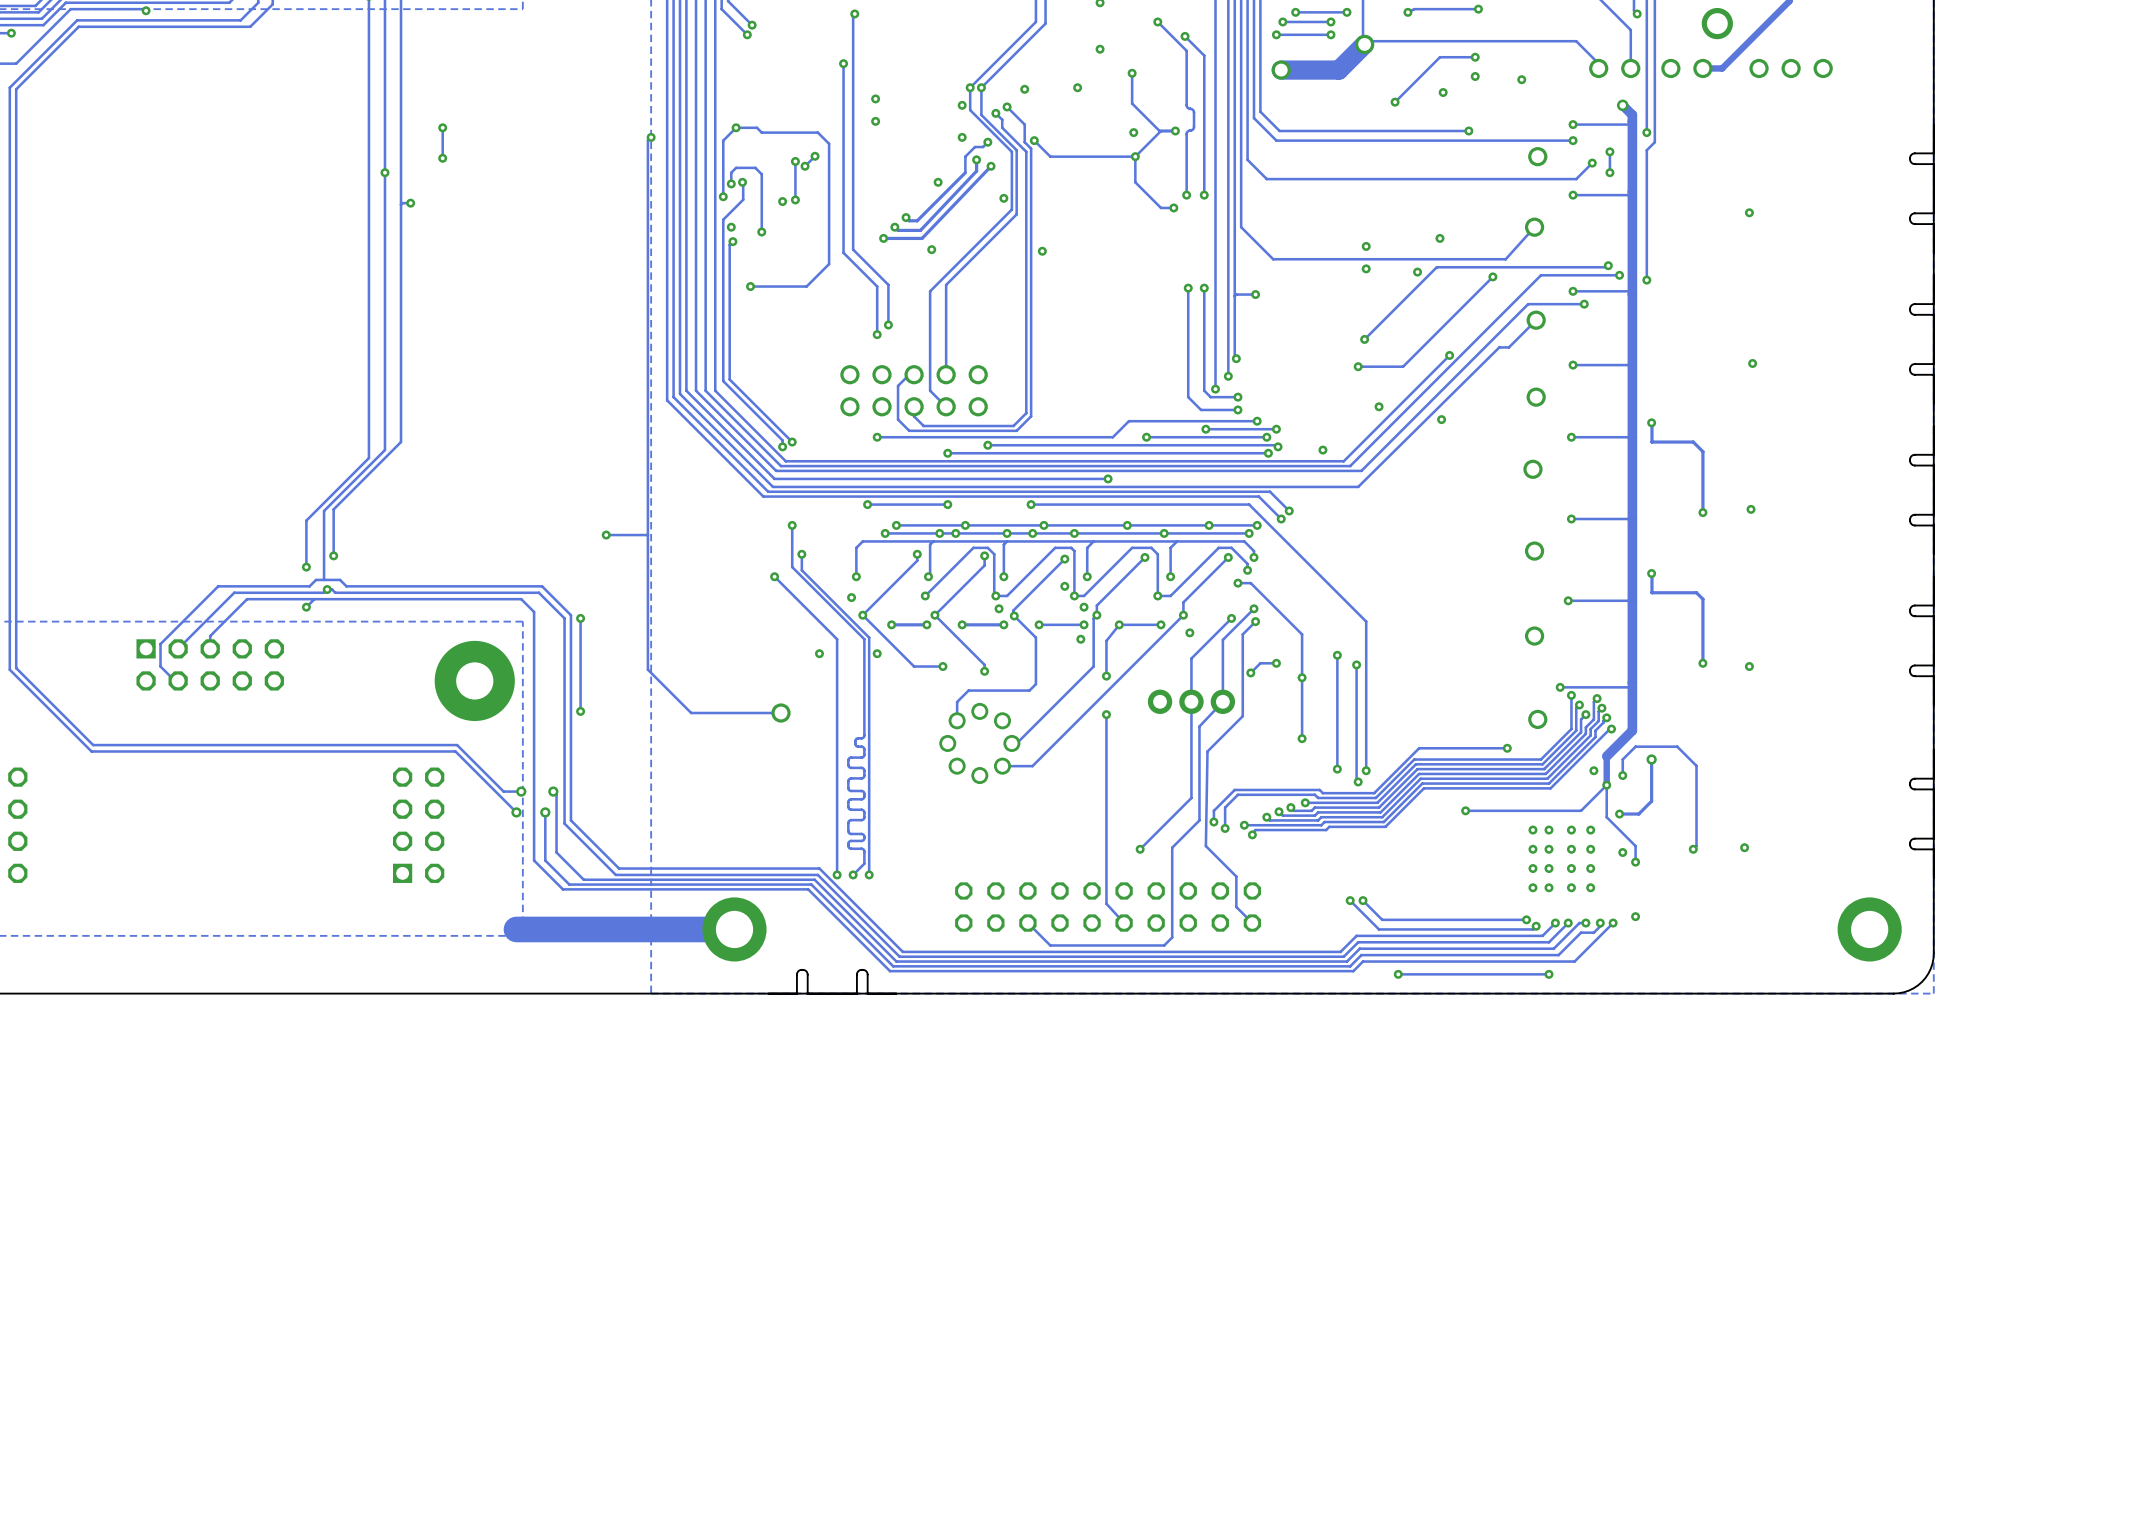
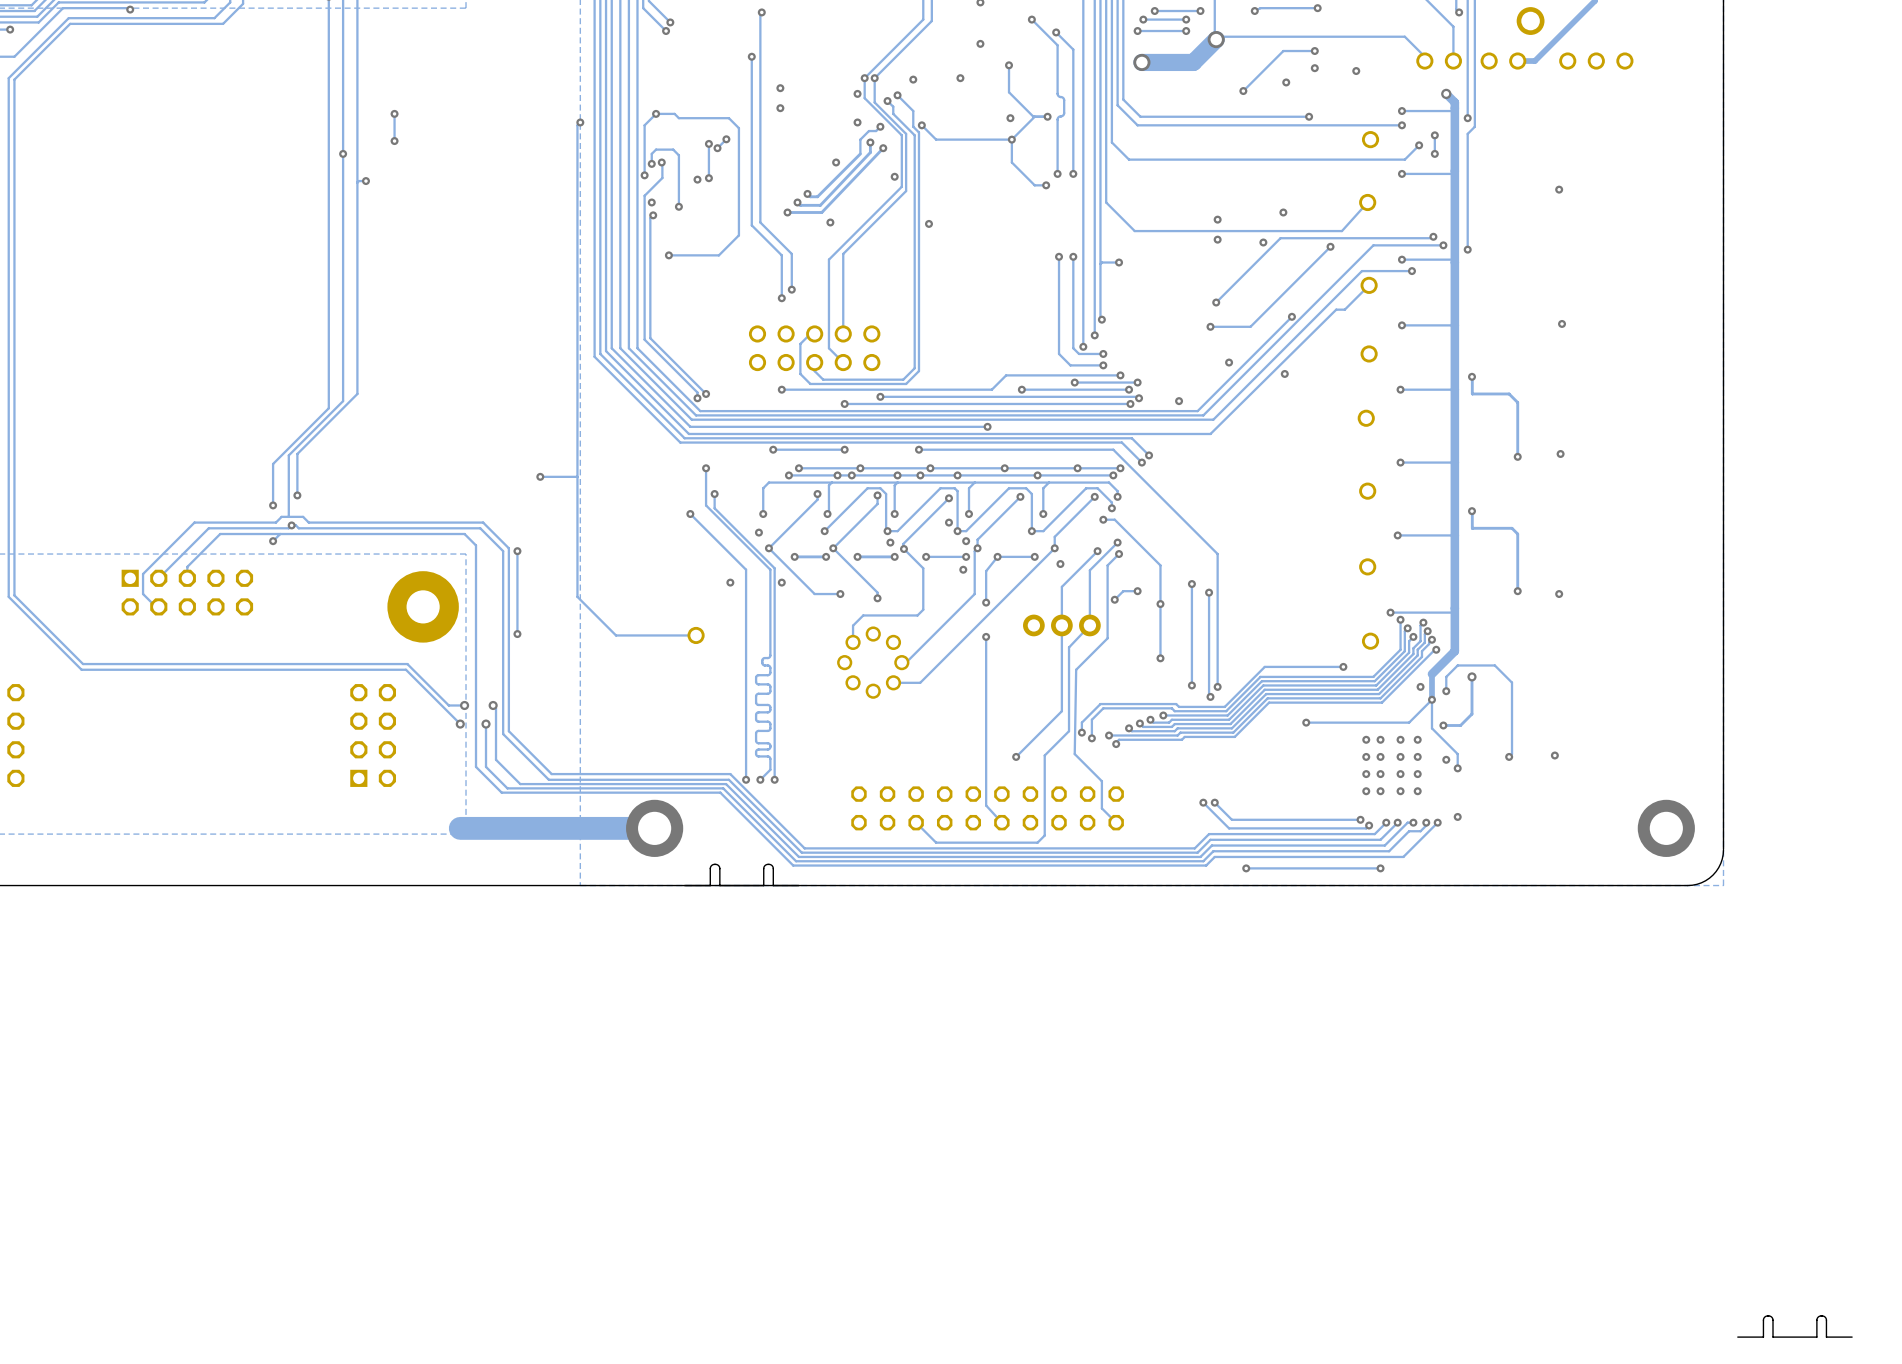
part: (1921, 188) -> none
part: (1921, 339) -> none
part: (1921, 490) -> none
part: (1921, 640) -> none
part: (1921, 814) -> none
part: none -> (1794, 1326)

